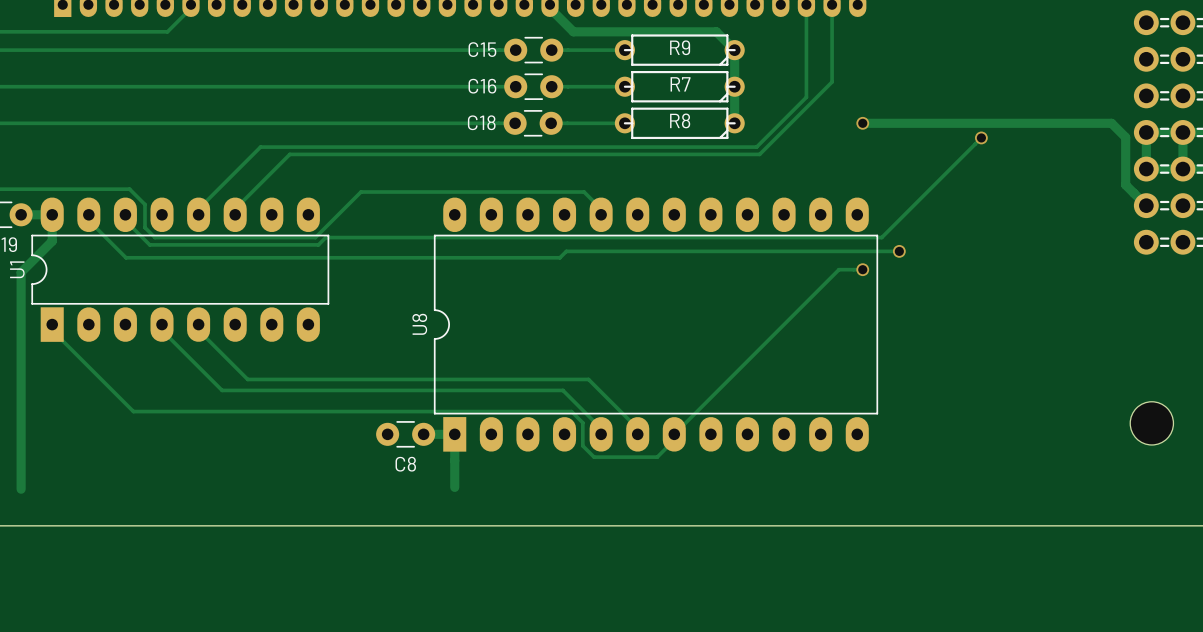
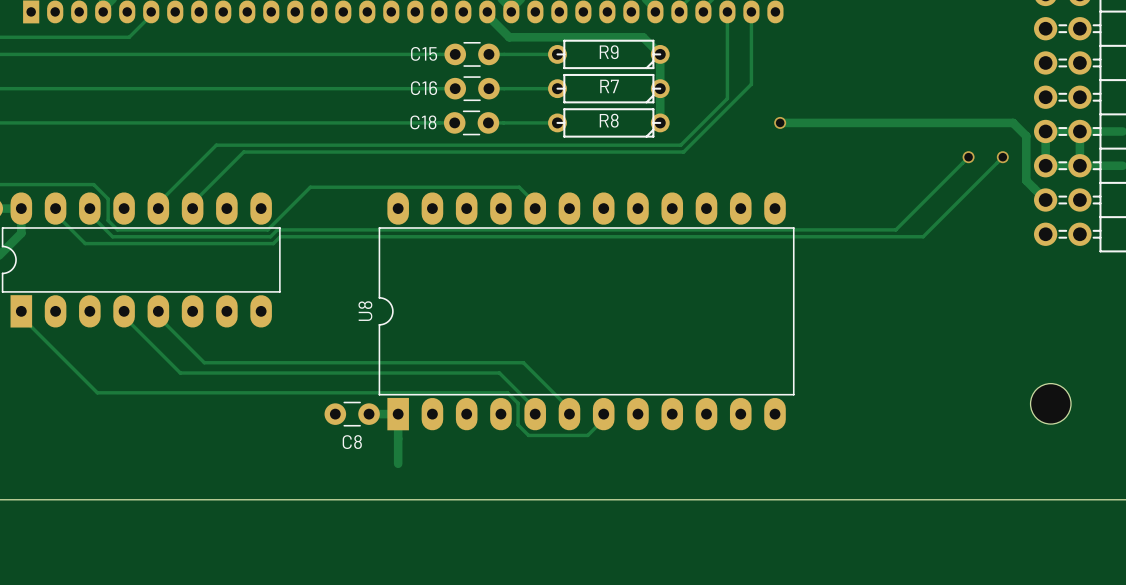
track: (981, 137) (881, 237) -> (968, 157) (895, 229) (797, 229)
via: (981, 137) -> none
via: none -> (968, 157)
via: none -> (1002, 157)
track: (899, 251) (566, 251) (559, 257) (126, 257) (120, 252) -> (1002, 157) (923, 236) (280, 236) (273, 243) (85, 243)
via: (899, 251) -> none
track: (862, 269) (838, 269) (674, 434) -> none
via: (862, 269) -> none

